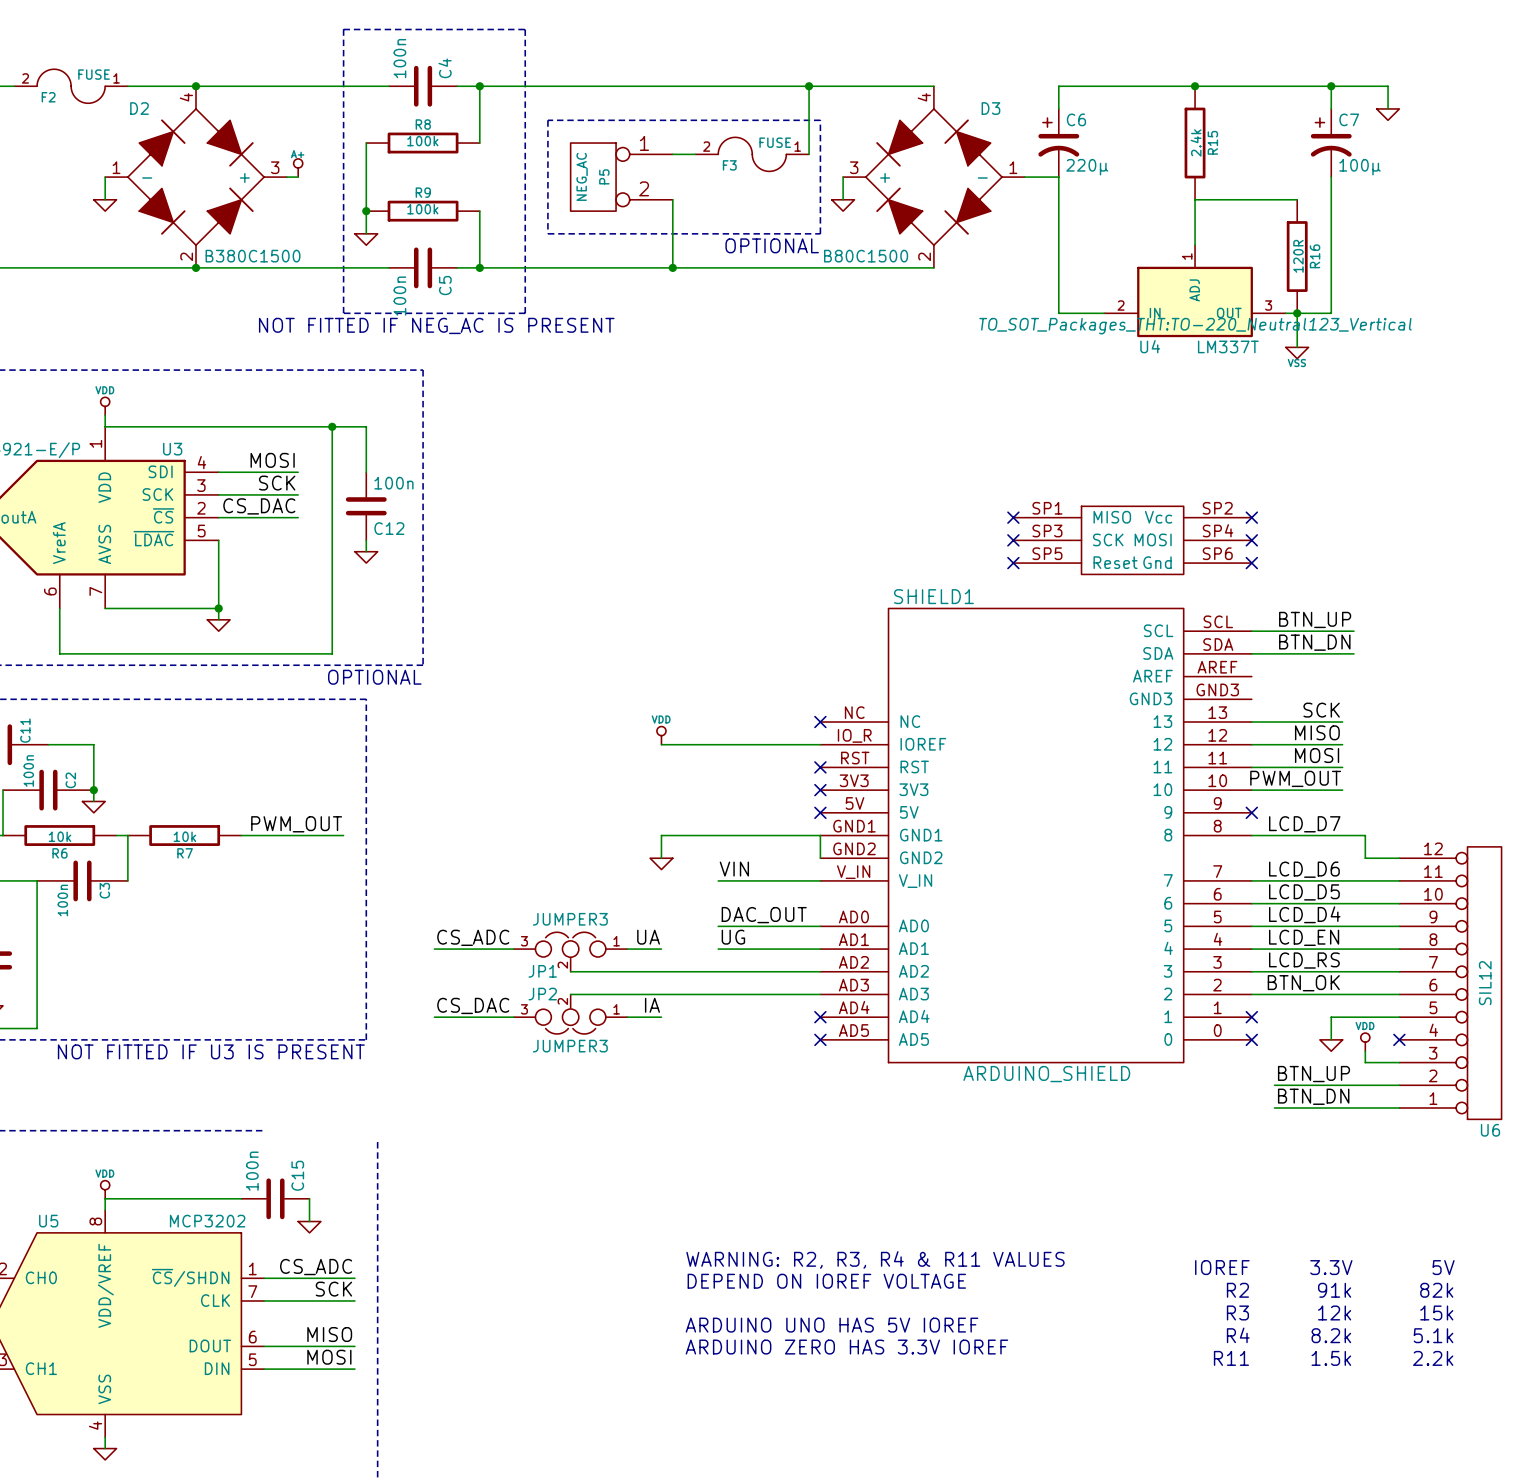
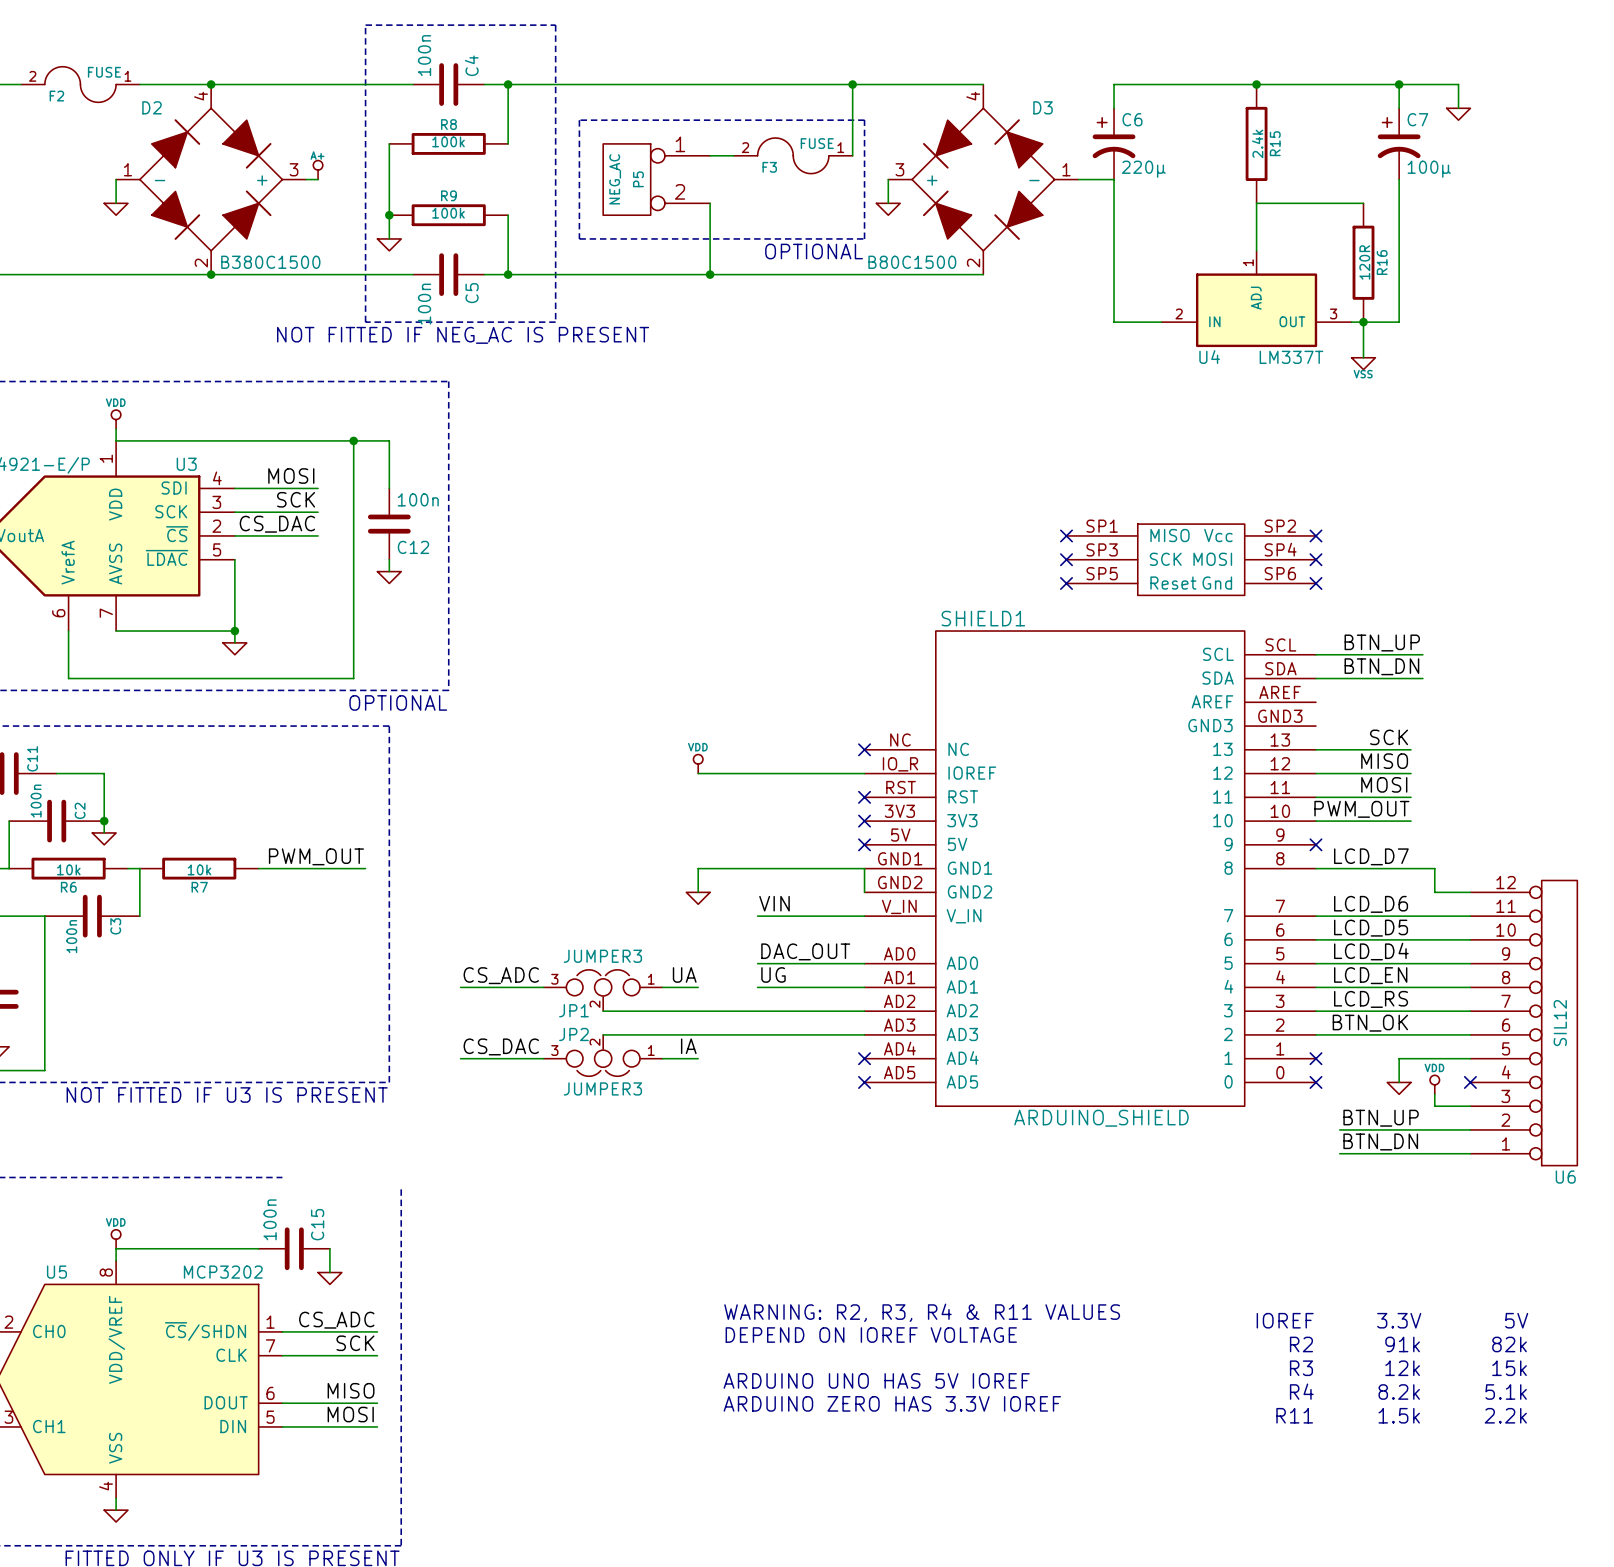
U4 text: TO_SOT_Packages_THT:TO-220_Neutral123_Vertical (1195, 326) -> none

